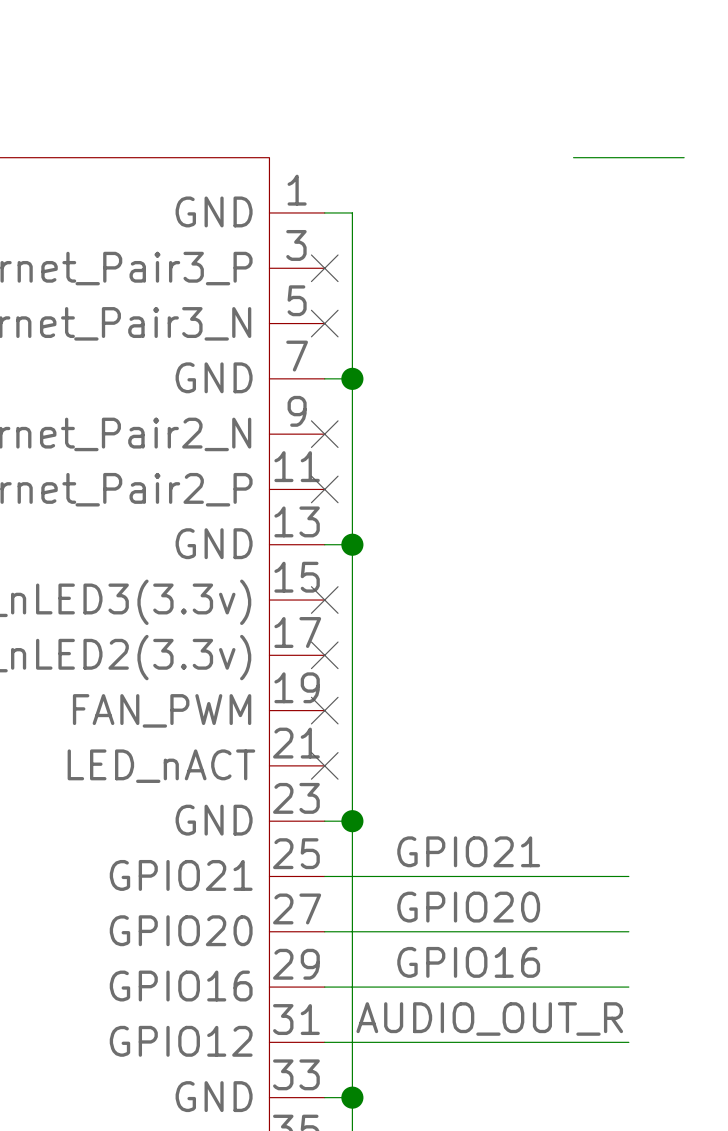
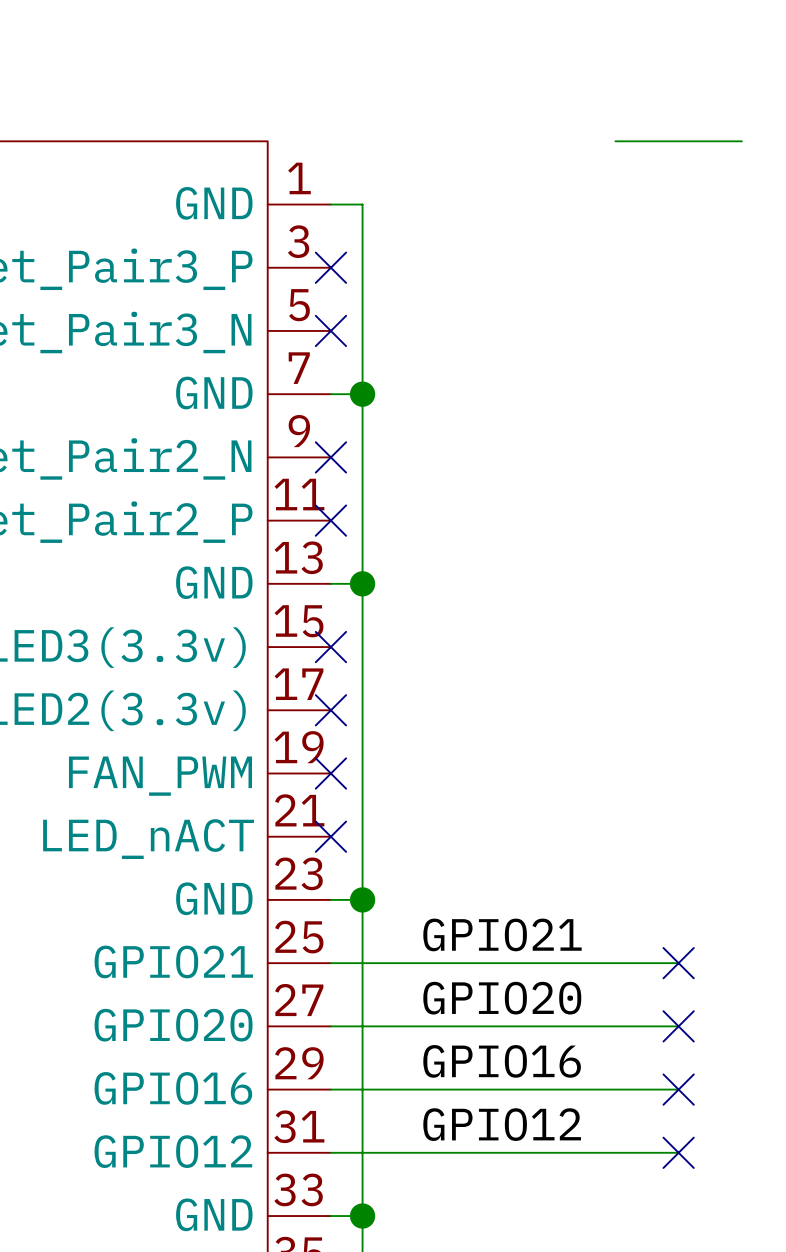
no-connect mark: none -> (678, 963)
no-connect mark: none -> (678, 1026)
no-connect mark: none -> (678, 1089)
label: none -> GPIO12 (502, 1124)
label: AUDIO_OUT_R (489, 1018) -> none
no-connect mark: none -> (678, 1152)

